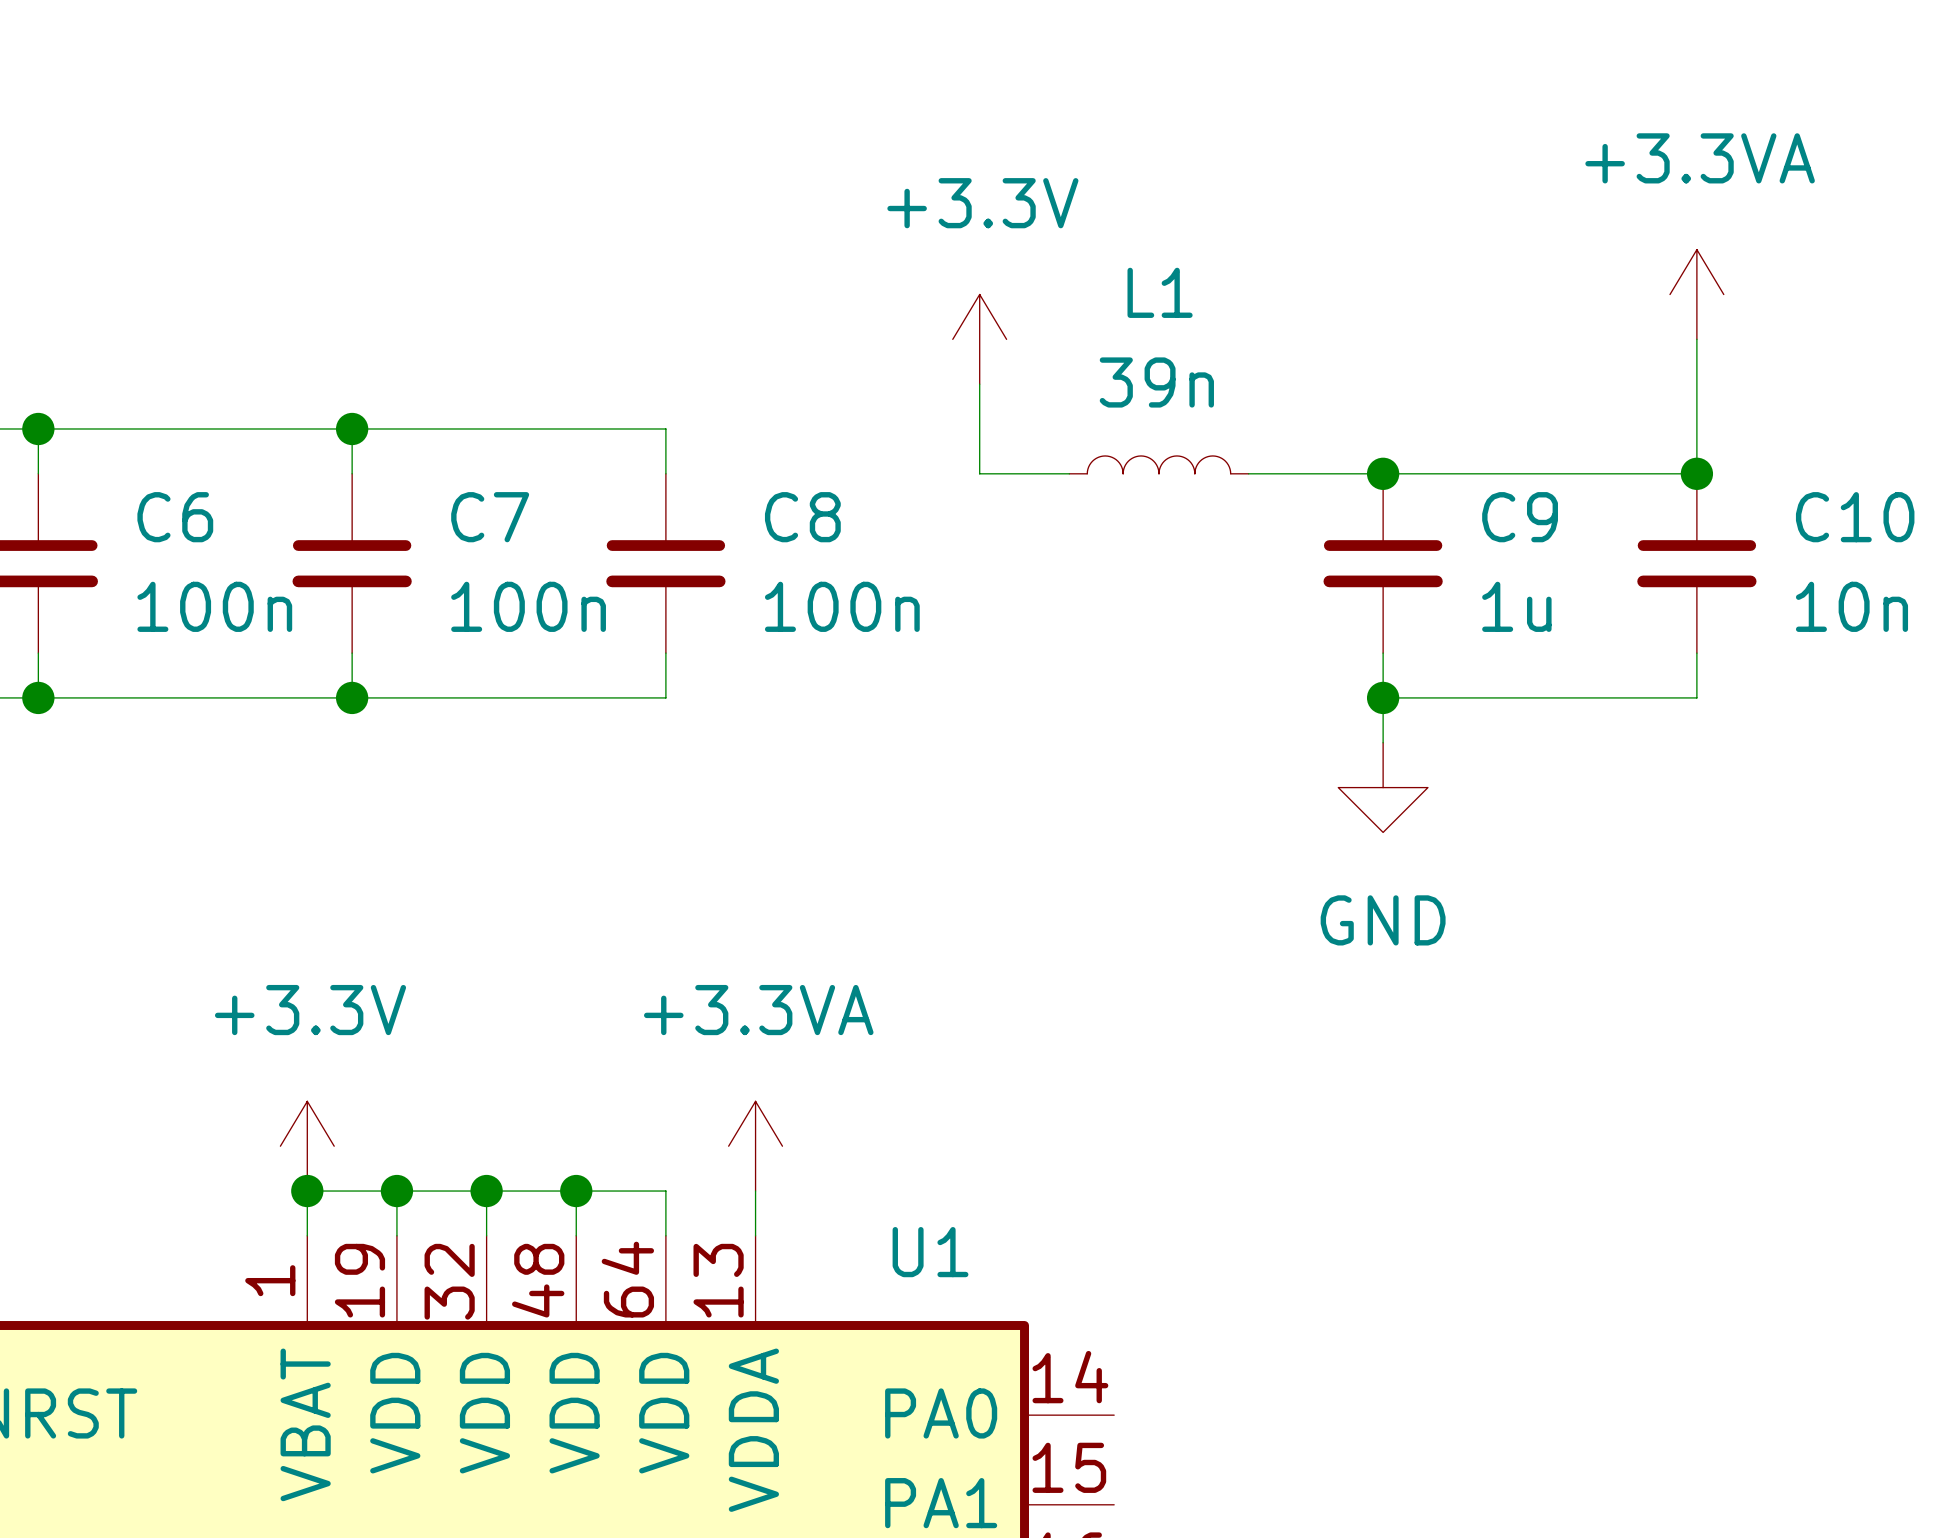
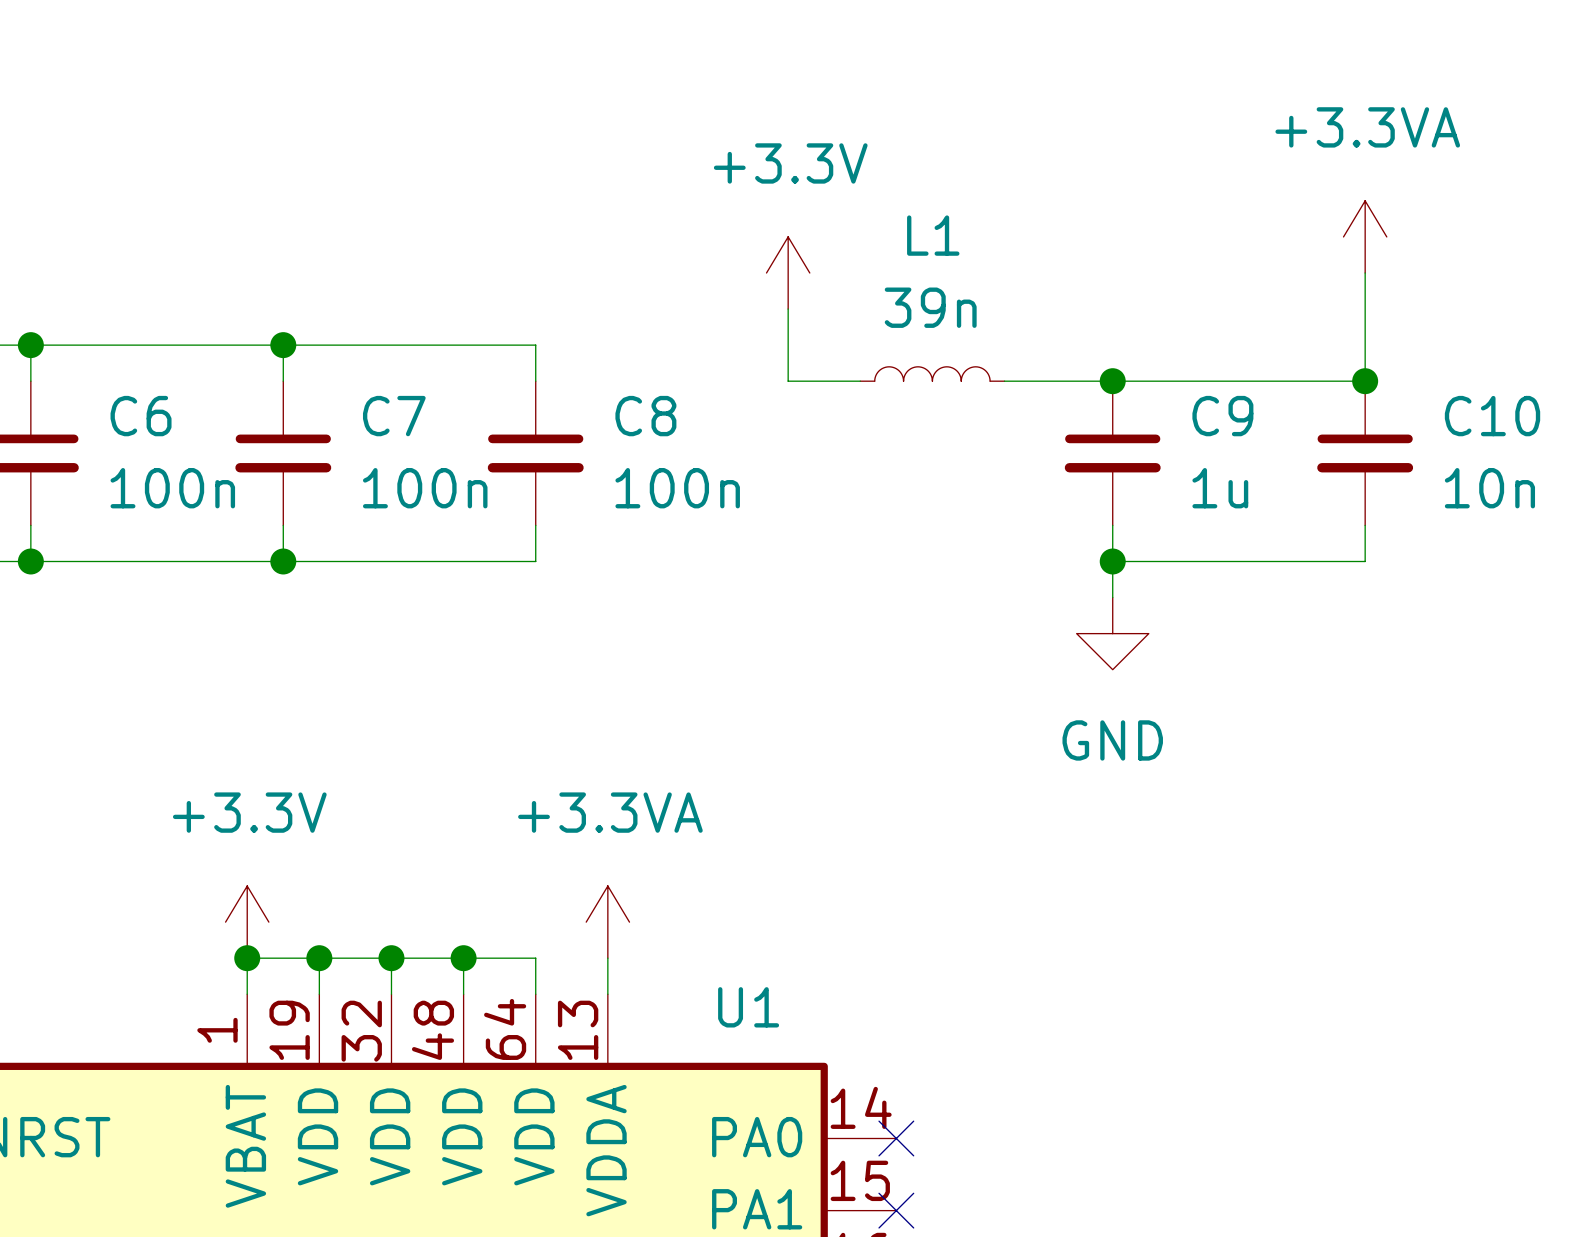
no-connect mark: none -> (896, 1138)
no-connect mark: none -> (896, 1210)

